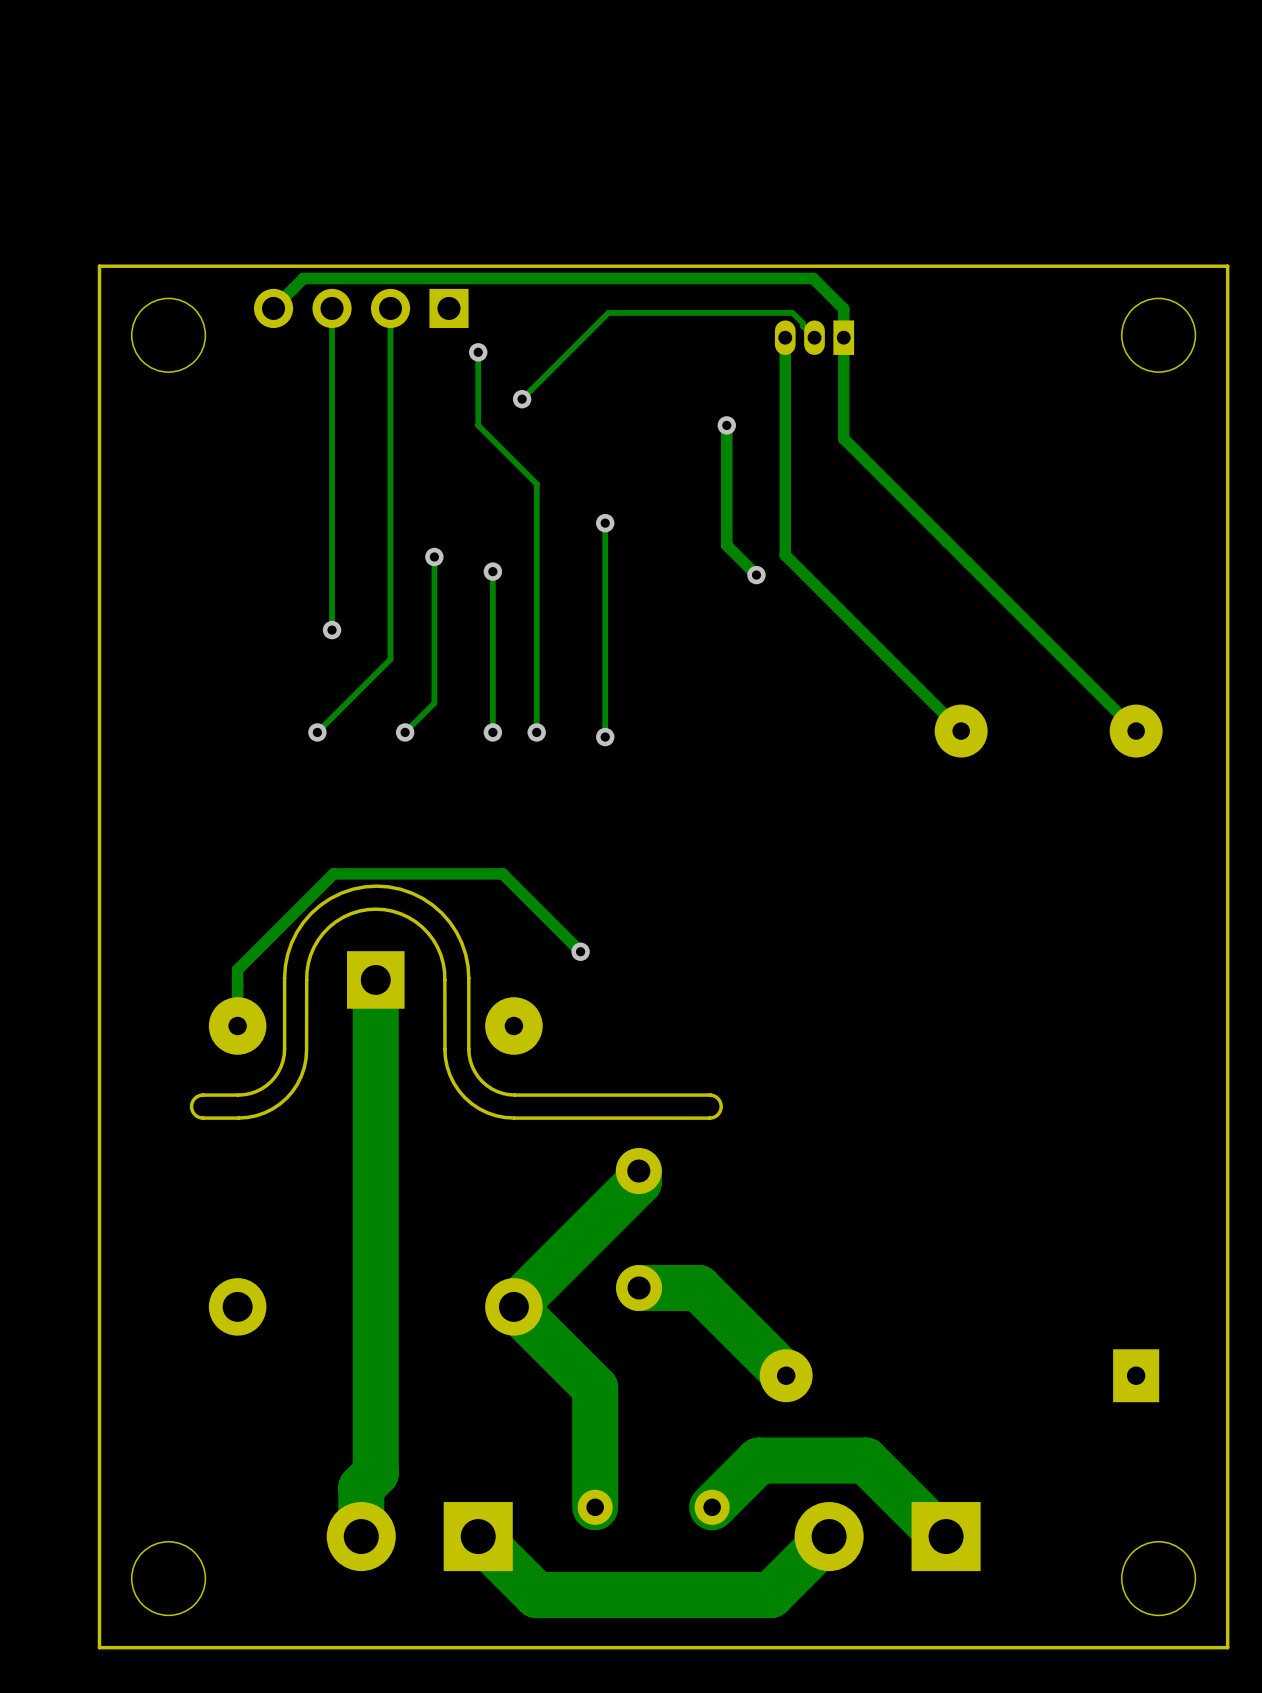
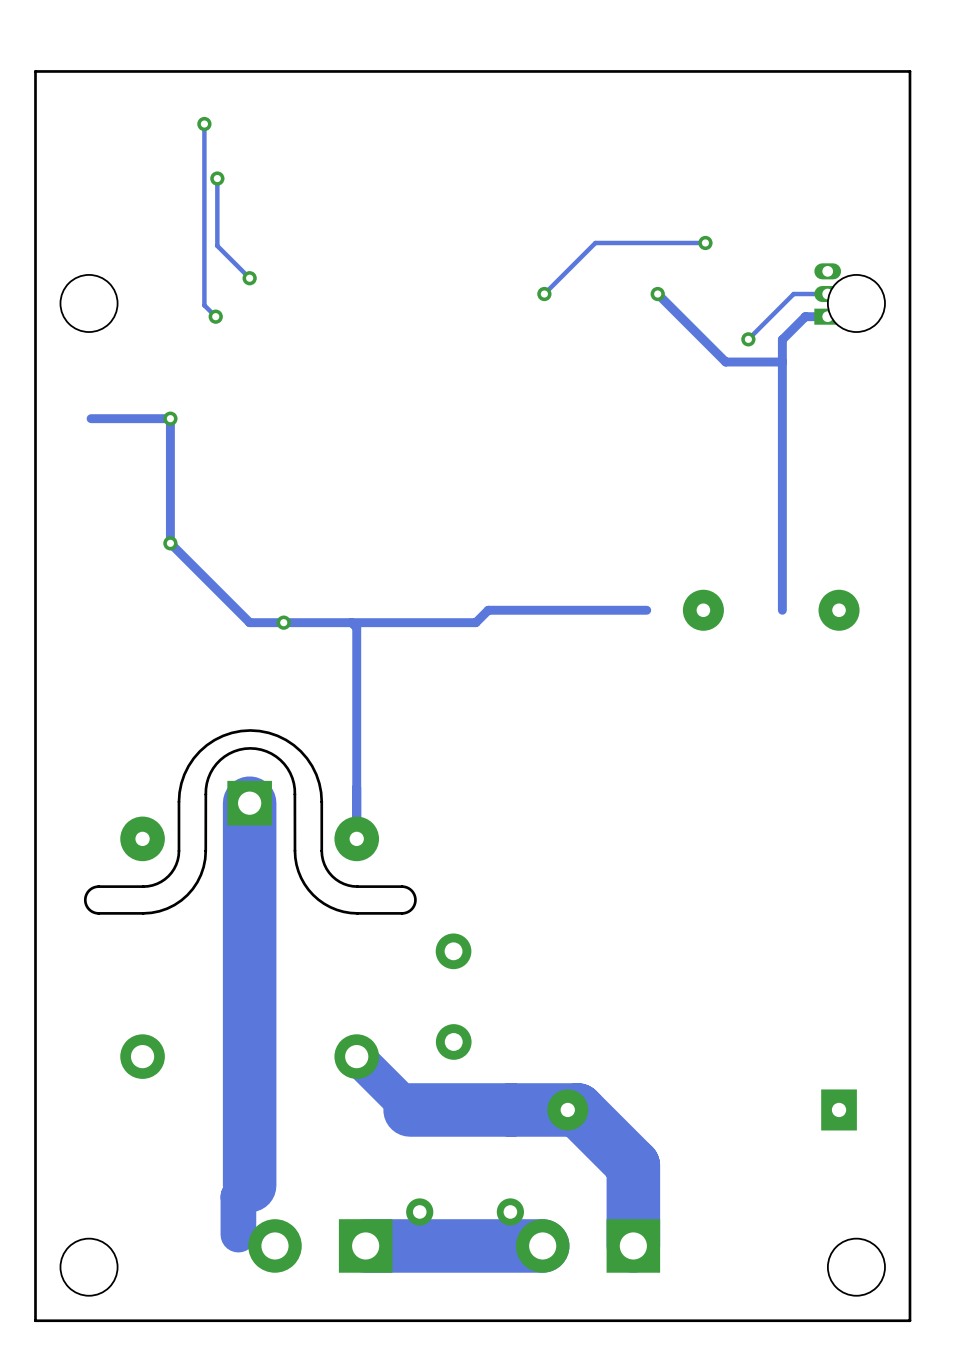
track: none -> (204, 124) (204, 305) (215, 316)
via: none -> (204, 124)
track: none -> (217, 178) (217, 245) (249, 278)
via: none -> (217, 178)
track: none -> (705, 242) (595, 242) (544, 294)
via: none -> (705, 242)
board edge: (1227, 266) (99, 266) -> (909, 249) (909, 71) (35, 71) (35, 249)
via: none -> (249, 278)
track: (273, 308) (303, 278) (813, 278) (843, 308) (843, 438) (1136, 731) -> none
track: (332, 308) (332, 630) -> none
part: (361, 308) -> none
track: (390, 308) (390, 659) (317, 732) -> none
via: none -> (544, 294)
track: none -> (657, 294) (725, 362) (782, 362)
via: none -> (657, 294)
track: none -> (827, 294) (793, 294) (748, 339)
track: (785, 337) (785, 555) (961, 731) -> none
track: (814, 337) (792, 312) (608, 312) (522, 399) -> none
part rotation: 0° (814, 337) -> 90° clockwise (827, 294)
part position: (814, 337) -> (827, 294)
via: none -> (215, 316)
track: (478, 352) (478, 425) (536, 483) (536, 732) -> none
via: (478, 352) -> none
track: none -> (827, 316) (805, 316) (782, 339) (782, 610)
via: none -> (748, 339)
via: (522, 399) -> none
track: (726, 425) (726, 545) (756, 575) -> none
via: (726, 425) -> none
track: none -> (91, 418) (170, 418) (170, 543) (249, 622) (475, 622) (488, 610) (646, 610)
via: none -> (170, 418)
track: (605, 523) (605, 737) -> none
via: (605, 523) -> none
track: (434, 556) (434, 703) (405, 732) -> none
via: (434, 556) -> none
track: (492, 571) (492, 732) -> none
via: (492, 571) -> none
via: (756, 575) -> none
via: (332, 630) -> none
via: none -> (170, 543)
via: (317, 732) -> none
via position: (405, 732) -> (283, 622)
via: (492, 732) -> none
via: (536, 732) -> none
via: (605, 737) -> none
track: none -> (351, 622) (356, 627) (356, 838)
track: (580, 951) (502, 873) (333, 873) (237, 969) (237, 1026) -> none
via: (580, 951) -> none
board edge: (306, 979) (310, 954) (323, 933) (343, 917) (359, 911) (375, 909) (400, 913) (422, 927) (433, 940) (440, 955) (444, 980) -> none
track width: thin (375, 979) (375, 1473) -> thick (249, 803) (249, 1185)
board edge: (306, 980) (306, 1049) -> none
board edge: (444, 980) (445, 1058) (454, 1083) (465, 1097) (479, 1108) (496, 1115) (513, 1118) -> none
board edge: (284, 1041) (283, 1060) (275, 1077) (261, 1088) (250, 1093) (238, 1095) -> (178, 850) (174, 868) (161, 881) (147, 886) (95, 887) (86, 894) (87, 906) (96, 913) (151, 912) (174, 905) (187, 895) (197, 882) (205, 859) (205, 788) (208, 778) (220, 760) (239, 749) (255, 748) (271, 753) (280, 760) (290, 773) (294, 788) (296, 864) (301, 877) (313, 895) (330, 907) (350, 912) (403, 913) (413, 906) (414, 894) (405, 887) (352, 886) (339, 881) (326, 868) (321, 850)
board edge: (468, 1041) (470, 1060) (474, 1072) (486, 1085) (502, 1093) (710, 1095) (718, 1098) (721, 1105) (717, 1114) (709, 1118) (514, 1118) -> none
board edge: (306, 1050) (304, 1067) (297, 1084) (286, 1098) (272, 1108) (256, 1115) (238, 1118) (201, 1117) (196, 1115) (191, 1109) (193, 1100) (200, 1095) (237, 1095) -> none
track: (638, 1171) (638, 1181) (513, 1306) -> none
track: (639, 1288) (698, 1288) (786, 1375) -> none
track: (582, 1375) (595, 1388) (595, 1507) -> (410, 1109) (577, 1109) (633, 1165) (633, 1245)
track: (712, 1507) (758, 1460) (865, 1460) (941, 1536) (946, 1536) -> none
part position: (419, 1536) -> (320, 1245)
track: (829, 1536) (770, 1595) (536, 1595) (478, 1536) -> none
part position: (887, 1536) -> (588, 1245)
track: none -> (542, 1245) (365, 1245)

